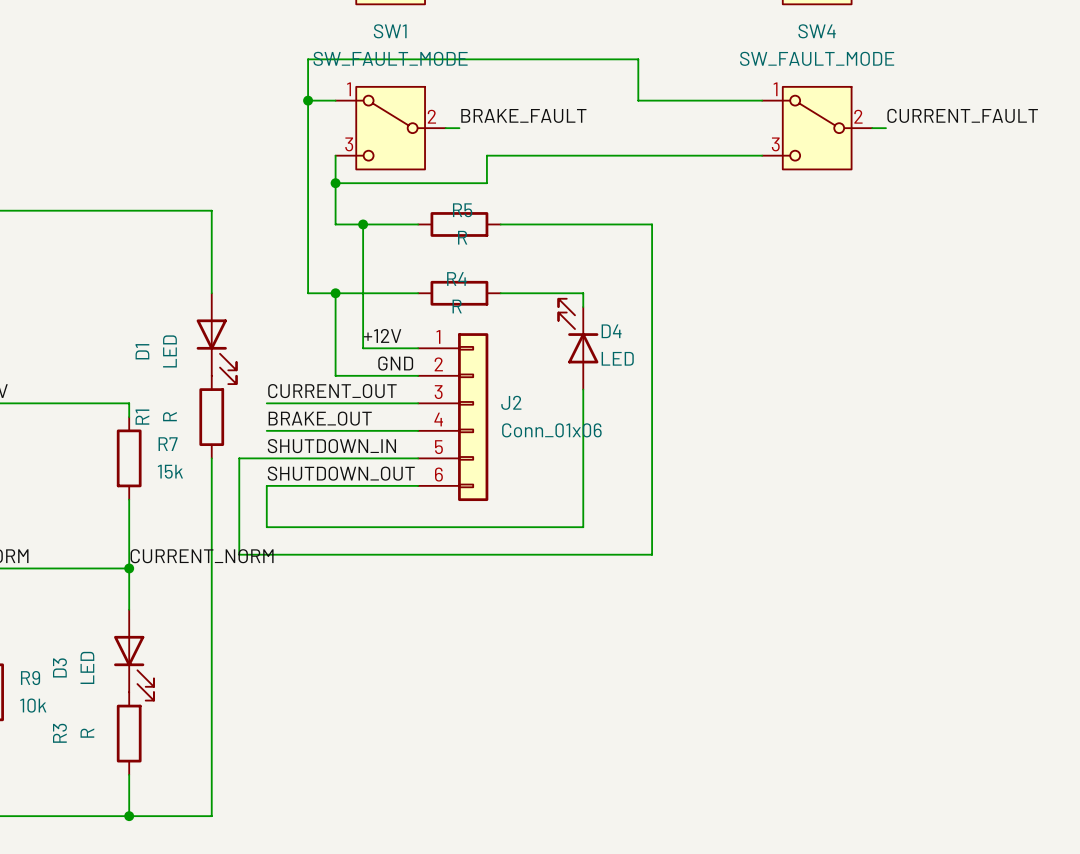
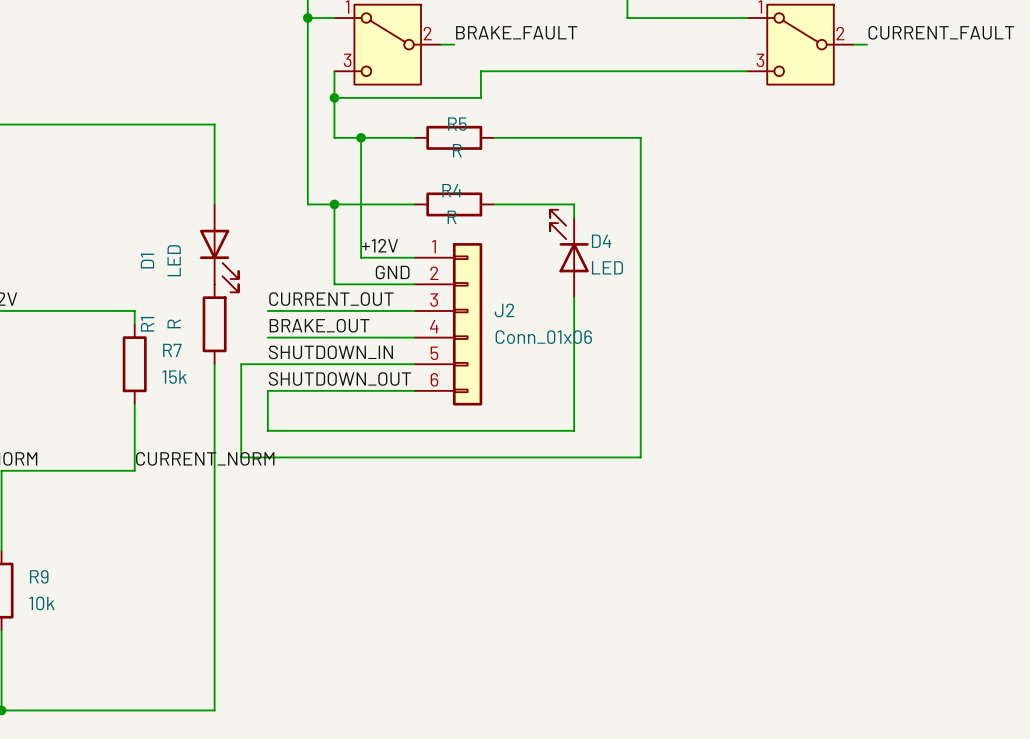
wire: (129, 568) (129, 609) -> none
junction: (129, 568) -> none
D3: LED (134, 655) -> none
R3: R (129, 733) -> none
wire: (129, 774) (129, 816) -> none
junction: (129, 816) -> none

